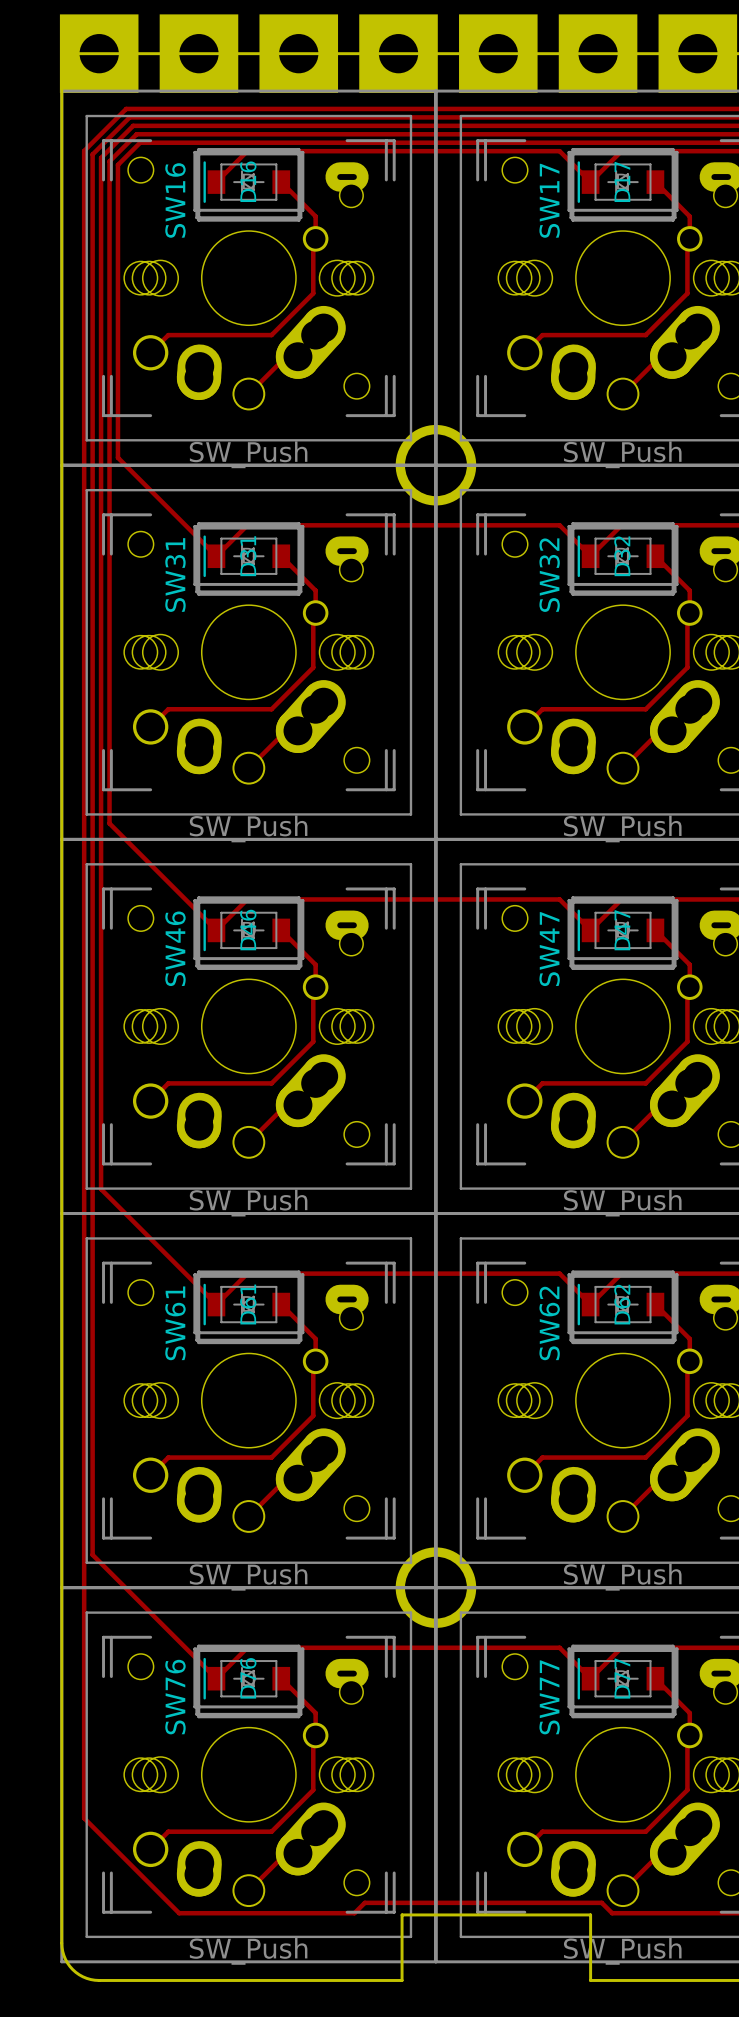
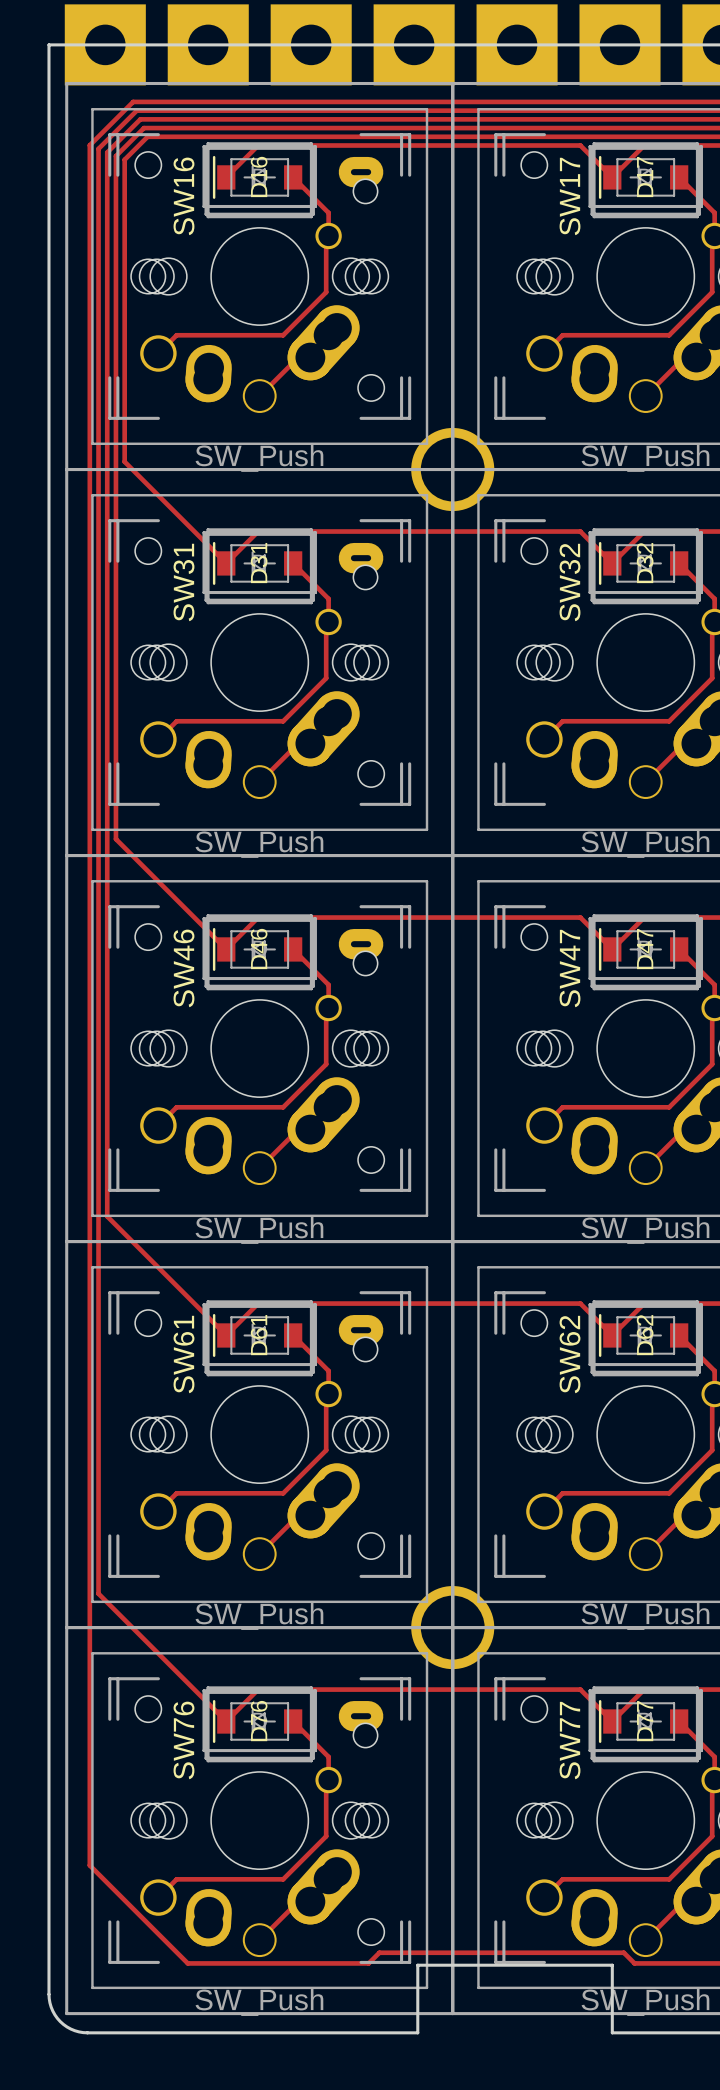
board edge: (61, 53) (61, 1943) (63, 1955) (72, 1969) (82, 1976) (99, 1980) -> (66, 44) (48, 44) (48, 1994) (52, 2011) (67, 2026) (83, 2032) (105, 2032)

